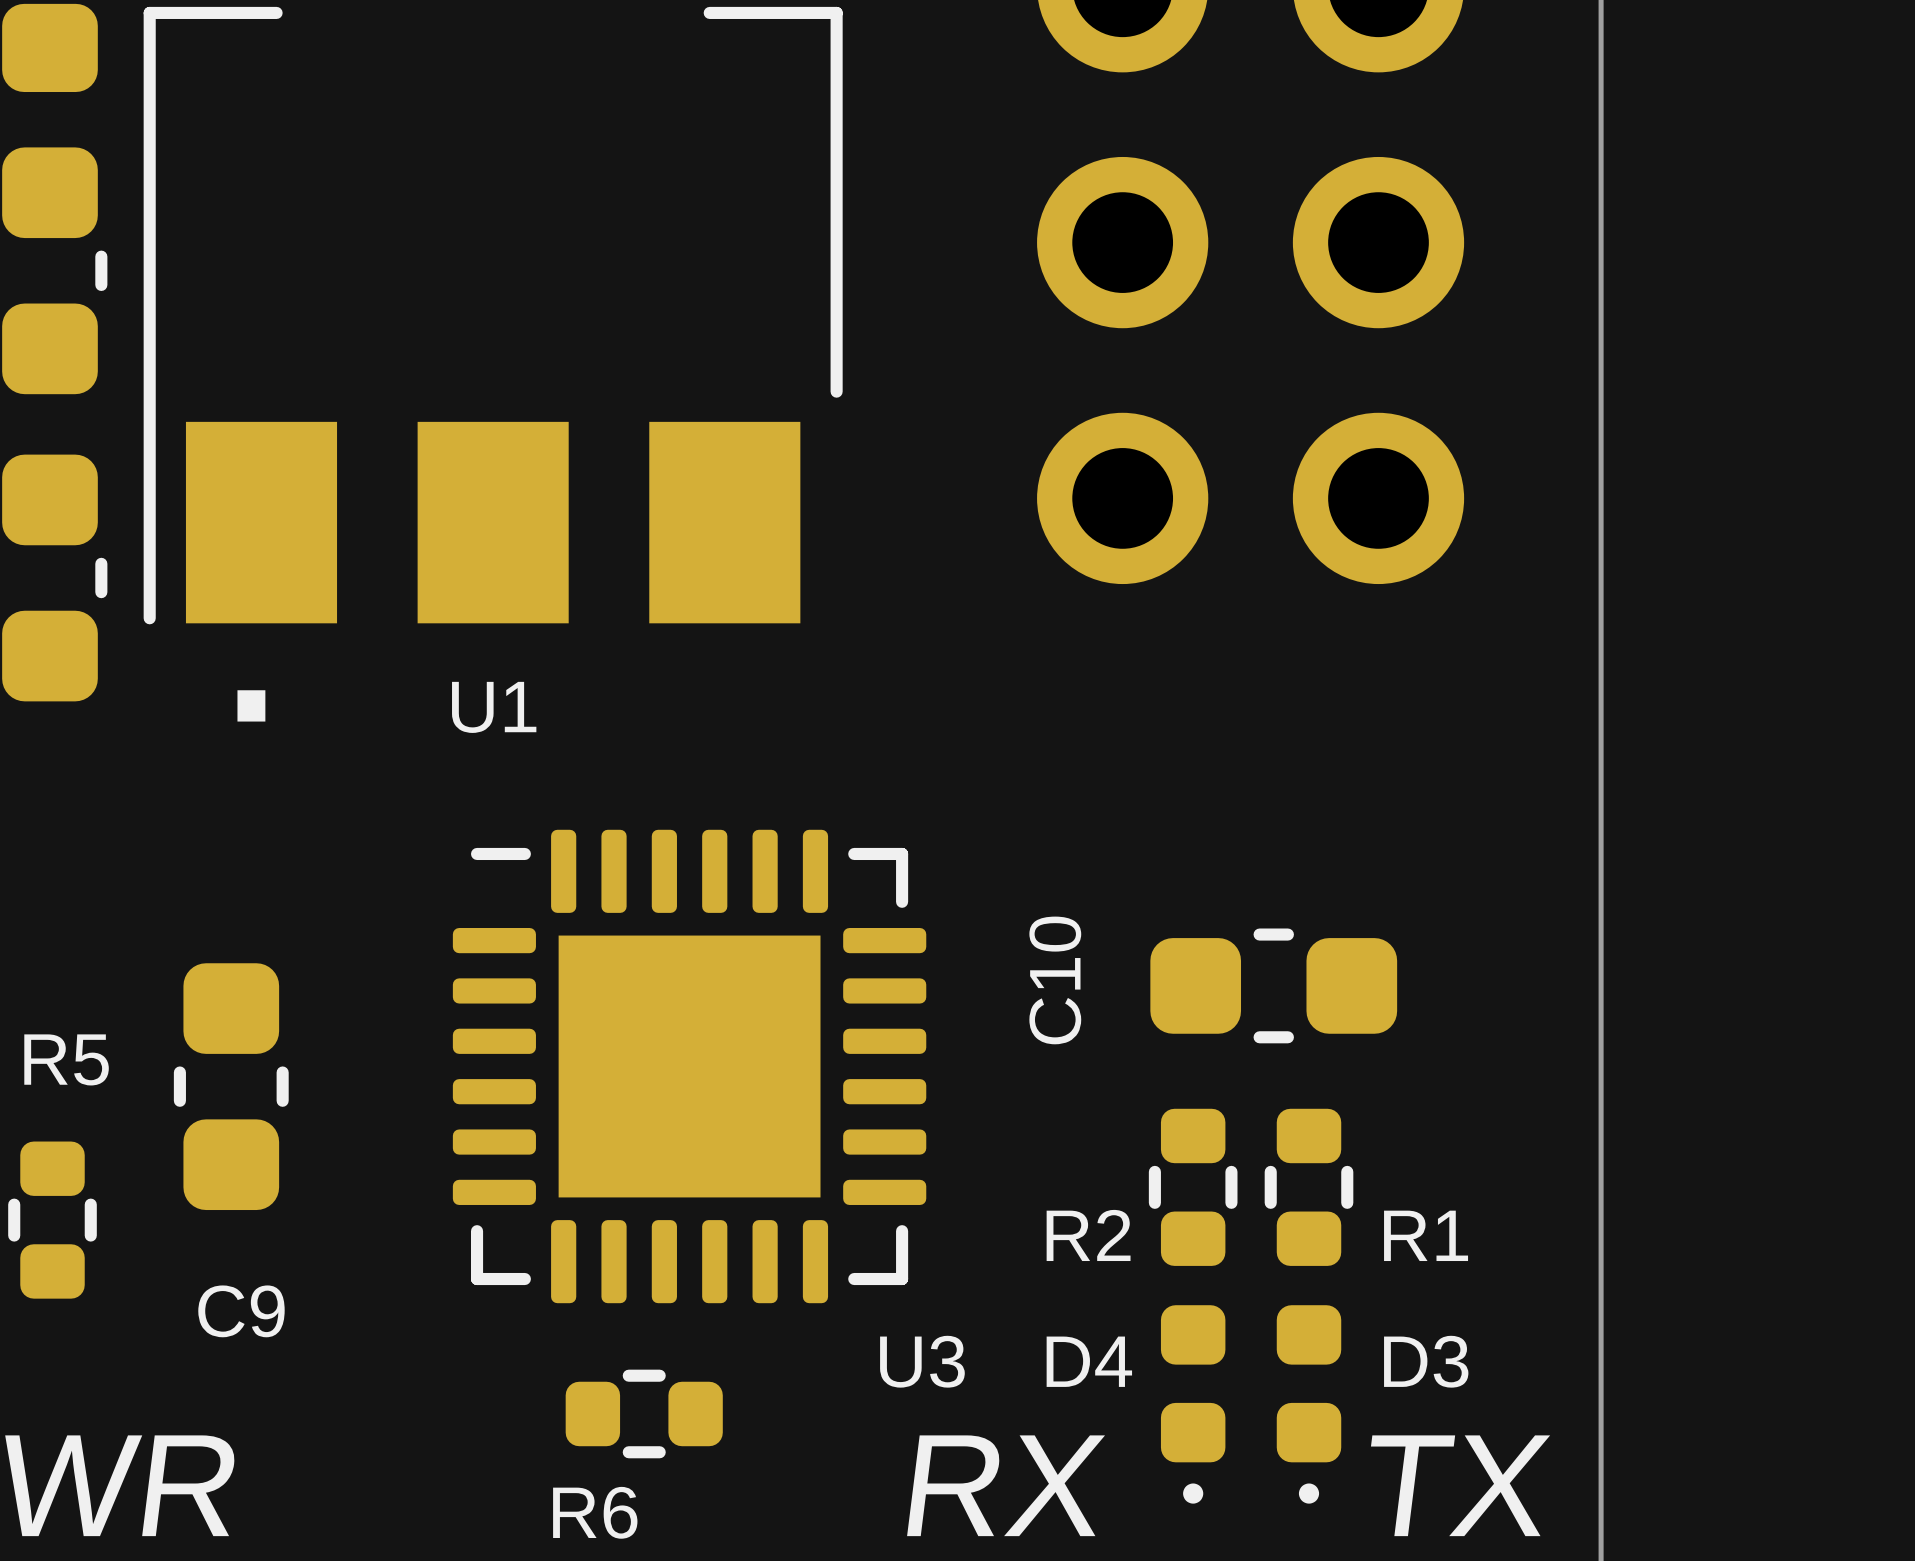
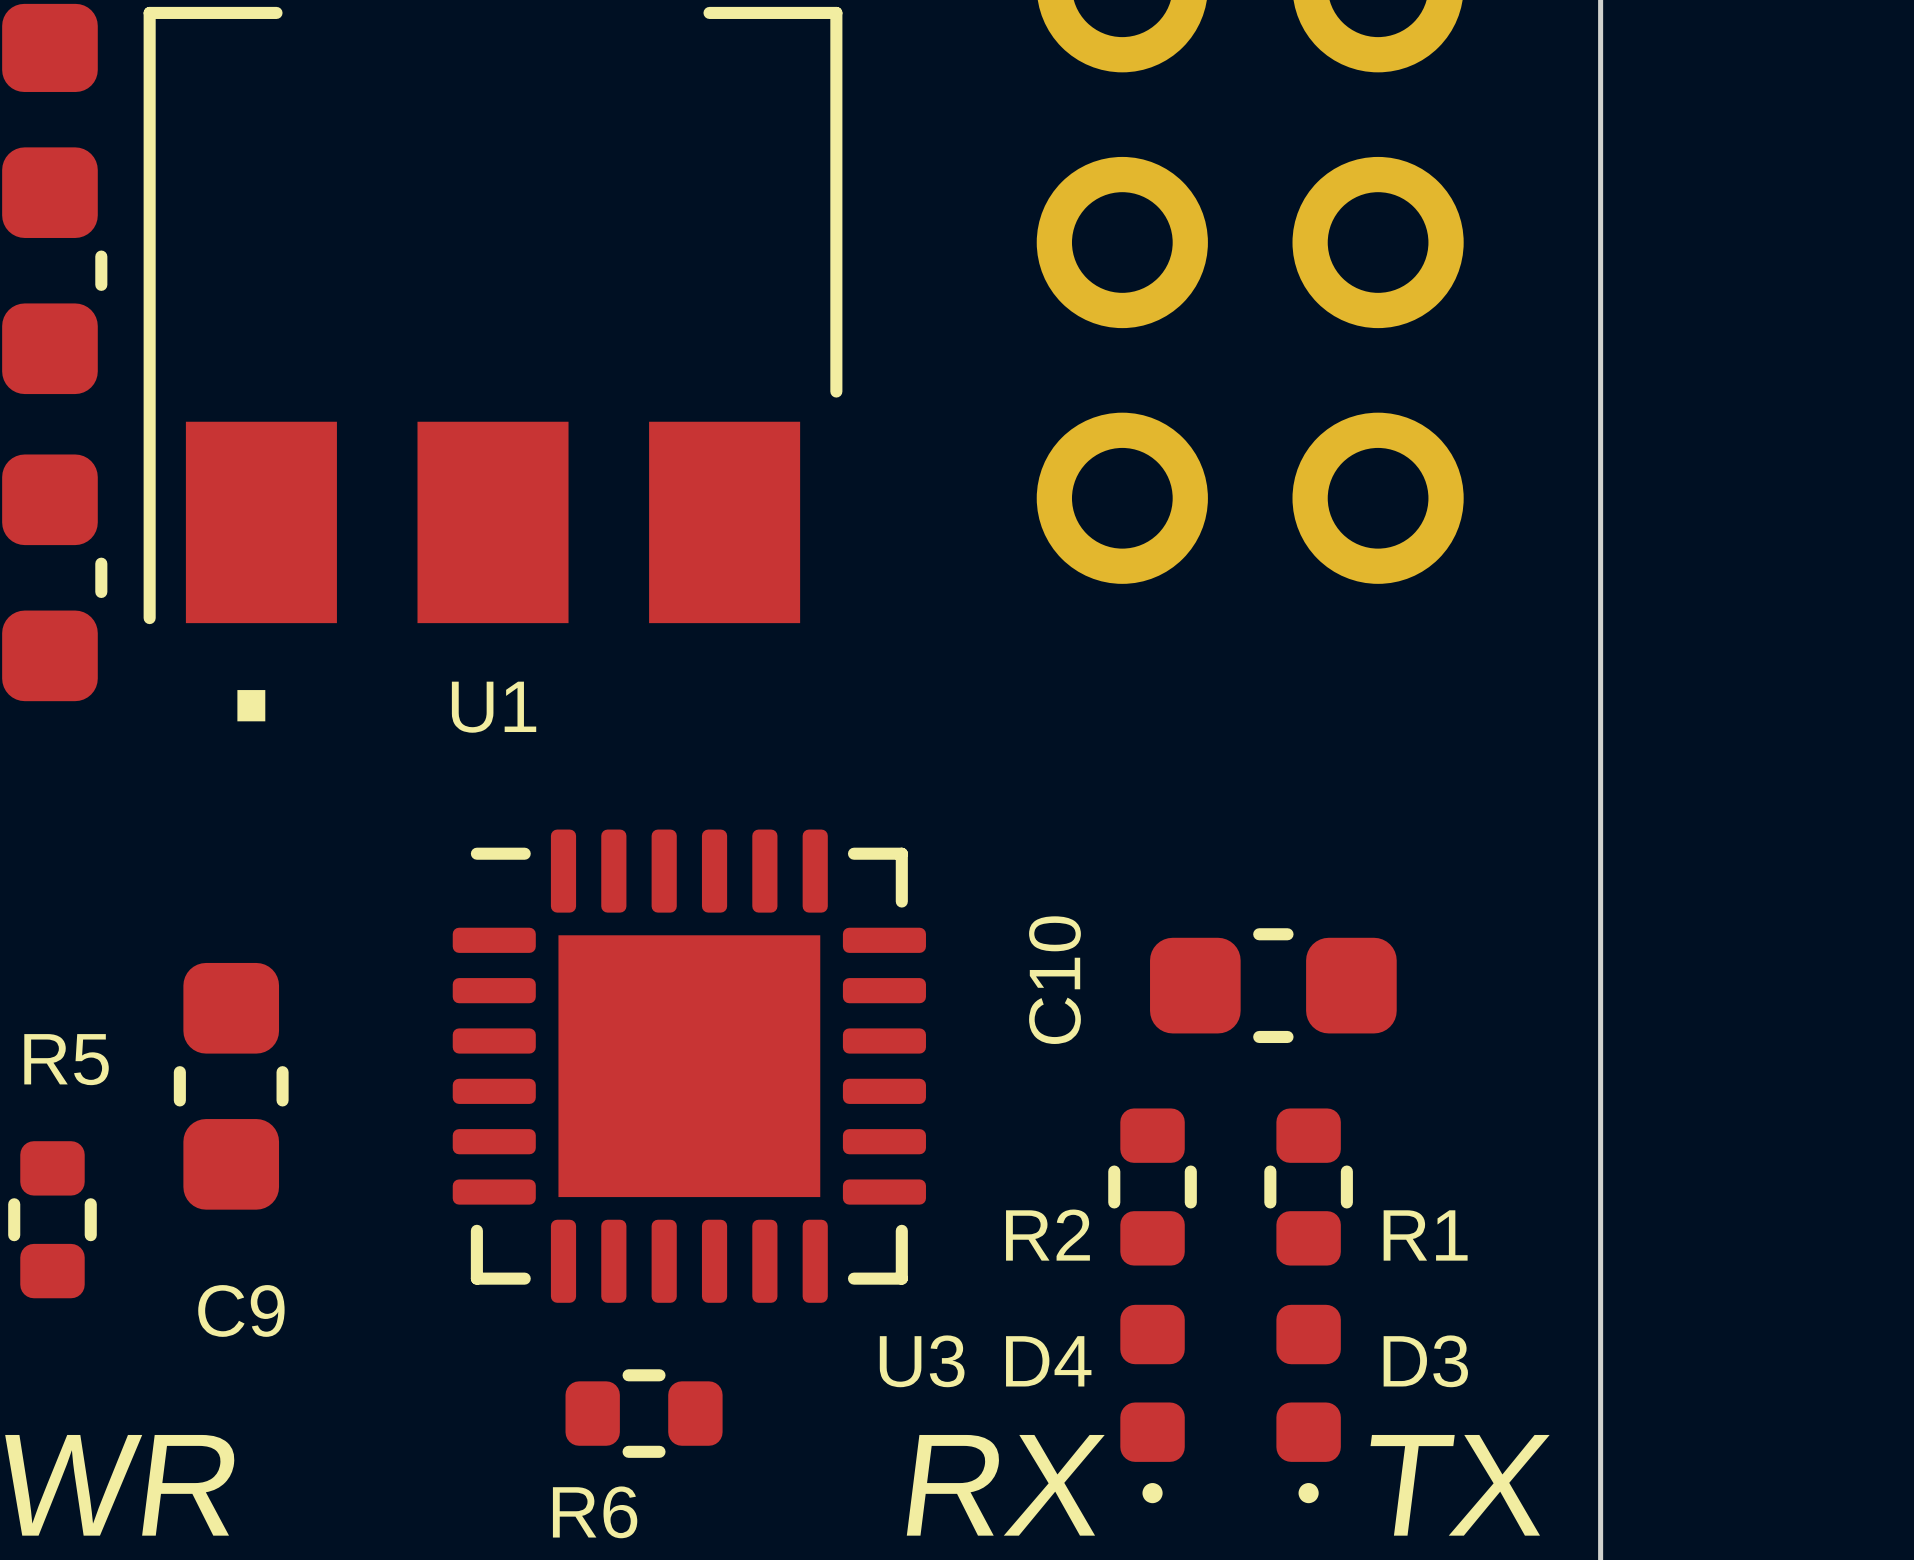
R2 position: (1193, 1187) -> (1152, 1187)
D4 position: (1193, 1404) -> (1152, 1403)

